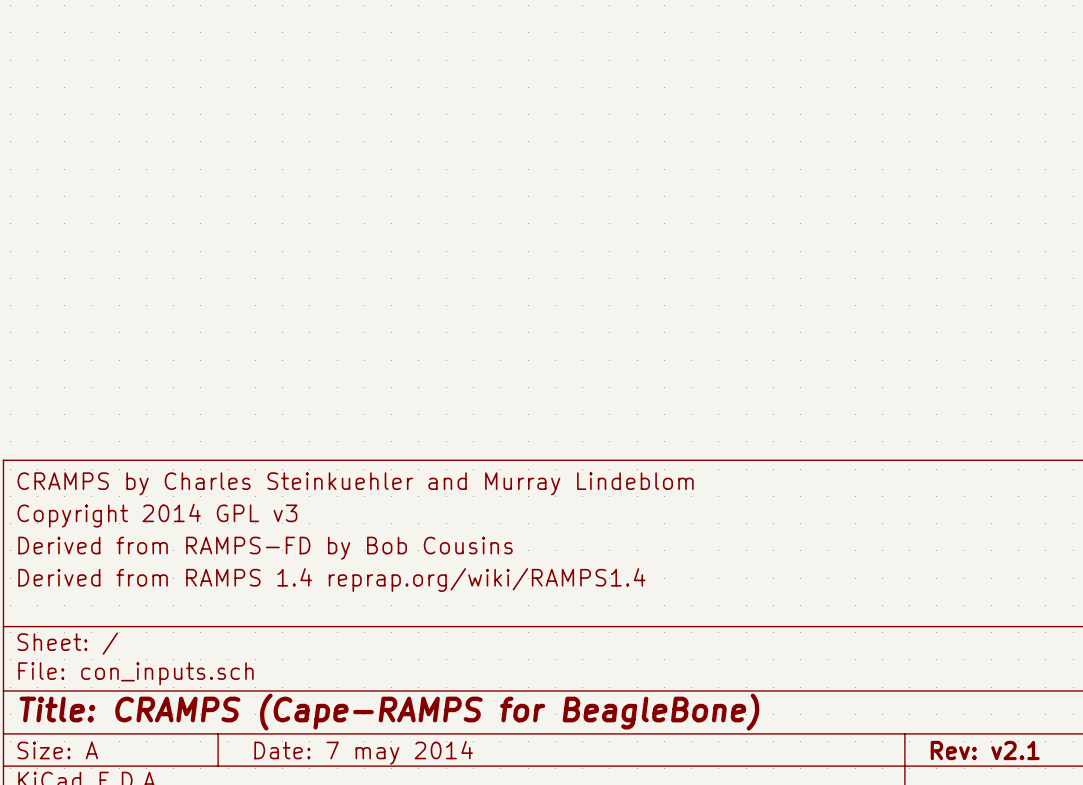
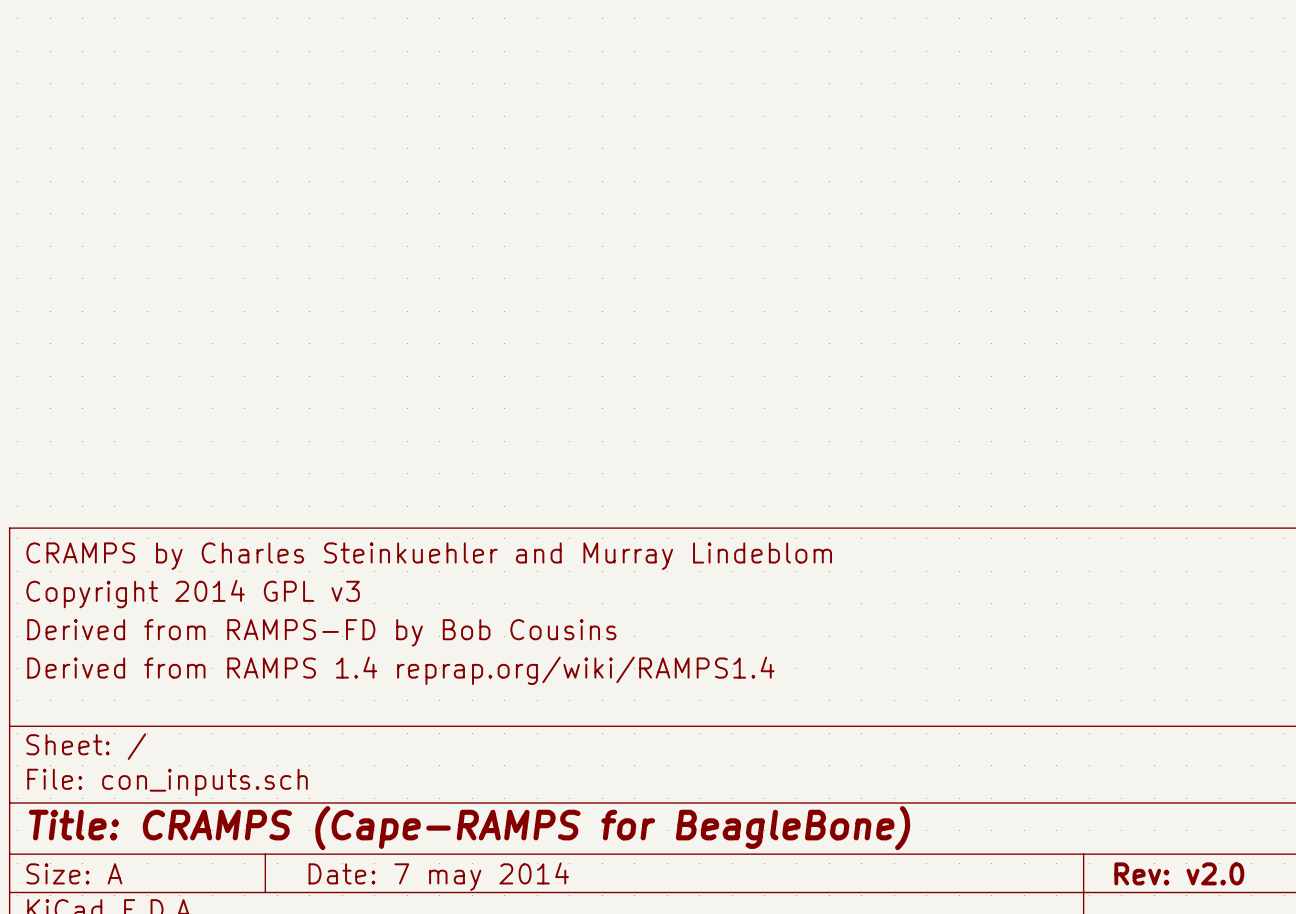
title block: Rev: v2.1 (985, 750) -> Rev: v2.0 (1179, 873)

